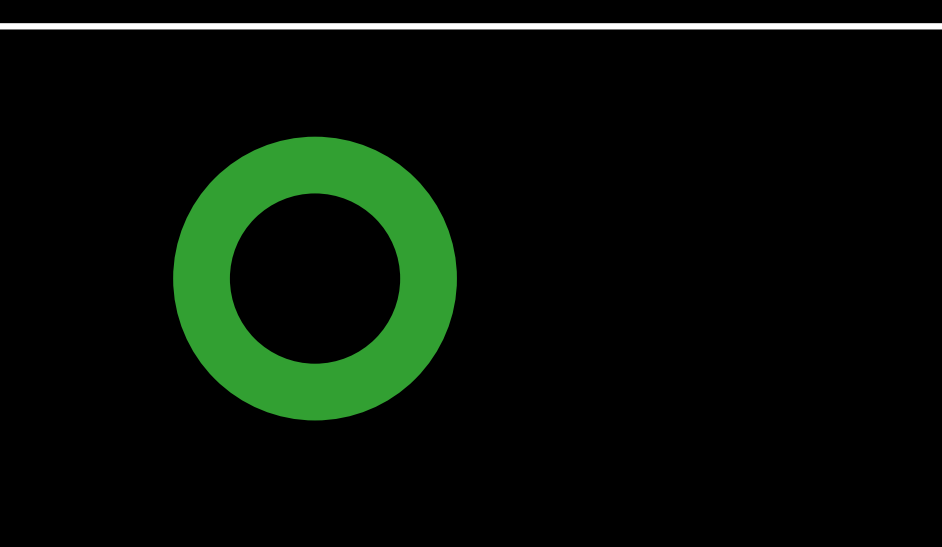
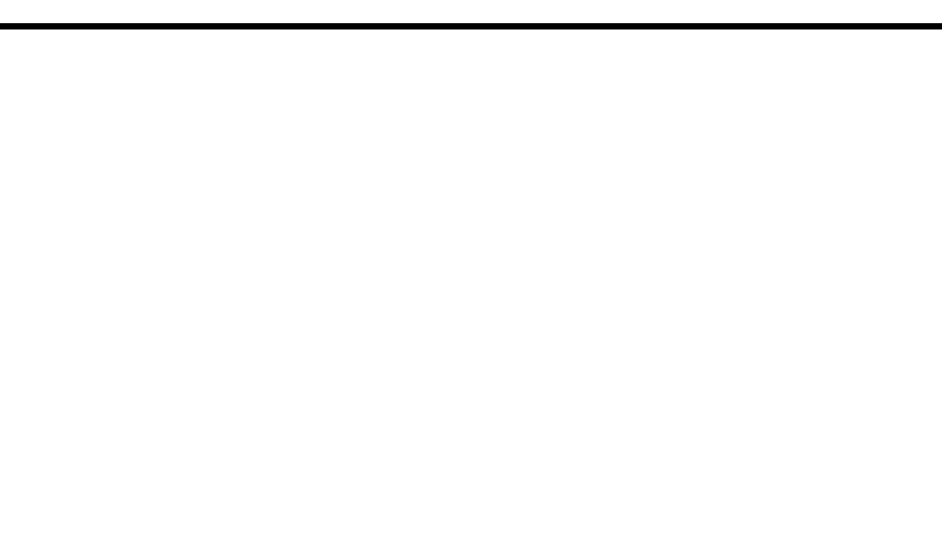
part: (315, 278) -> none

